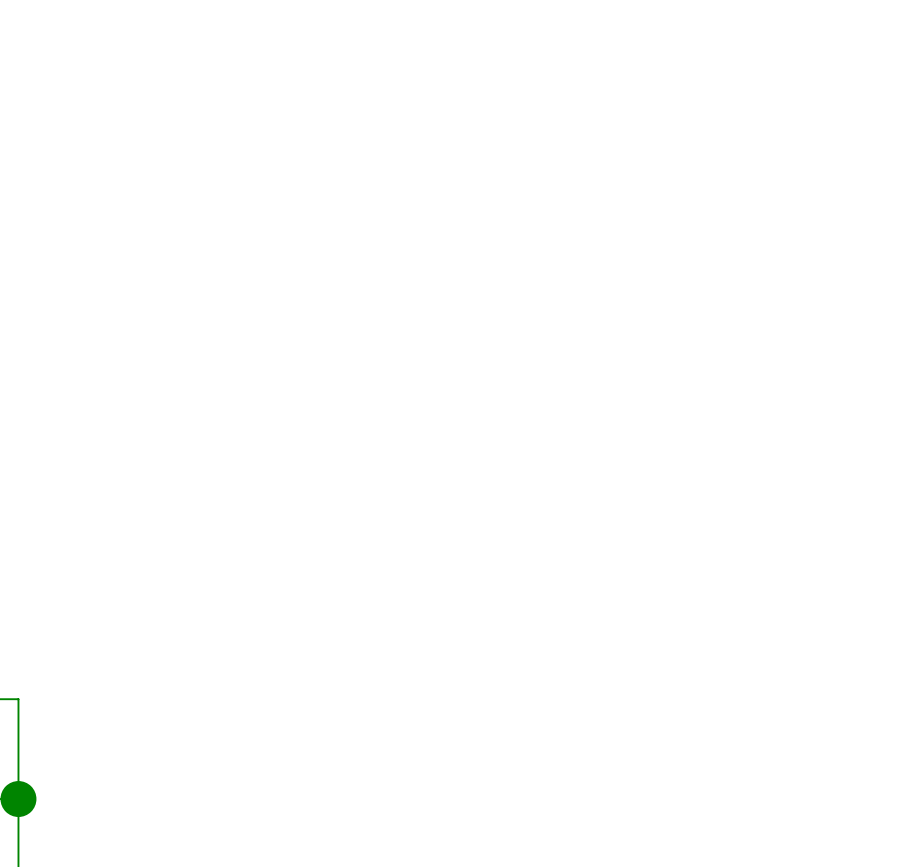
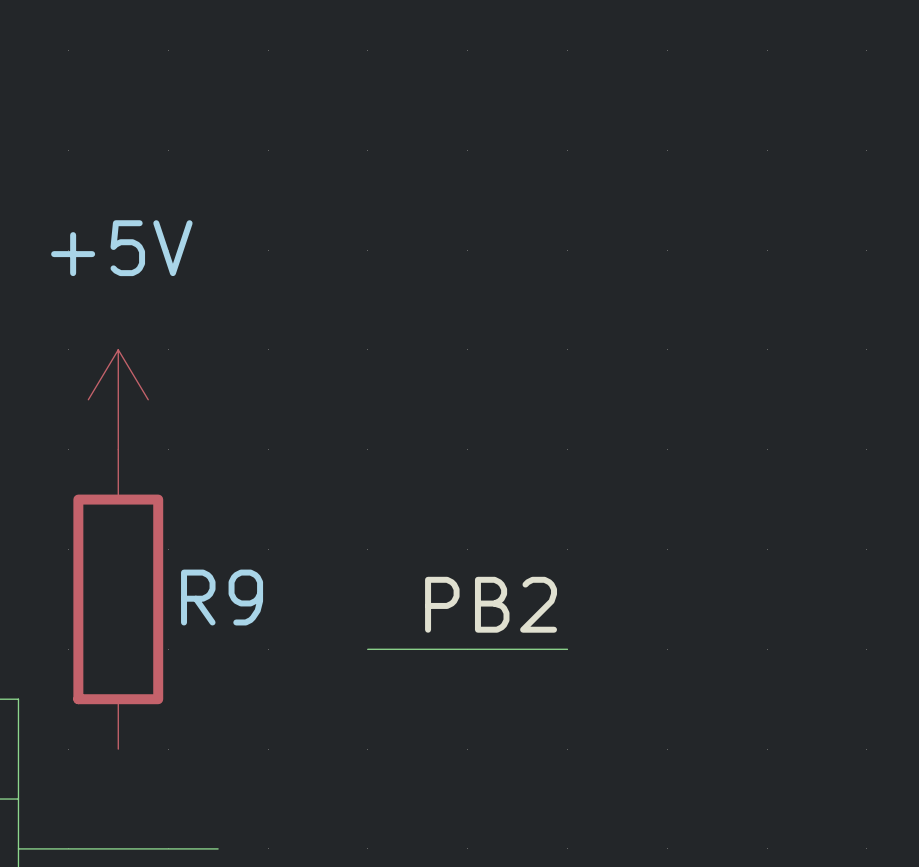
power symbol: none -> +5V (118, 399)
R9: none -> (118, 599)
label: none -> PB2 (491, 604)
wire: none -> (367, 649) (567, 649)
junction: (18, 799) -> none
wire: none -> (18, 848) (218, 848)

